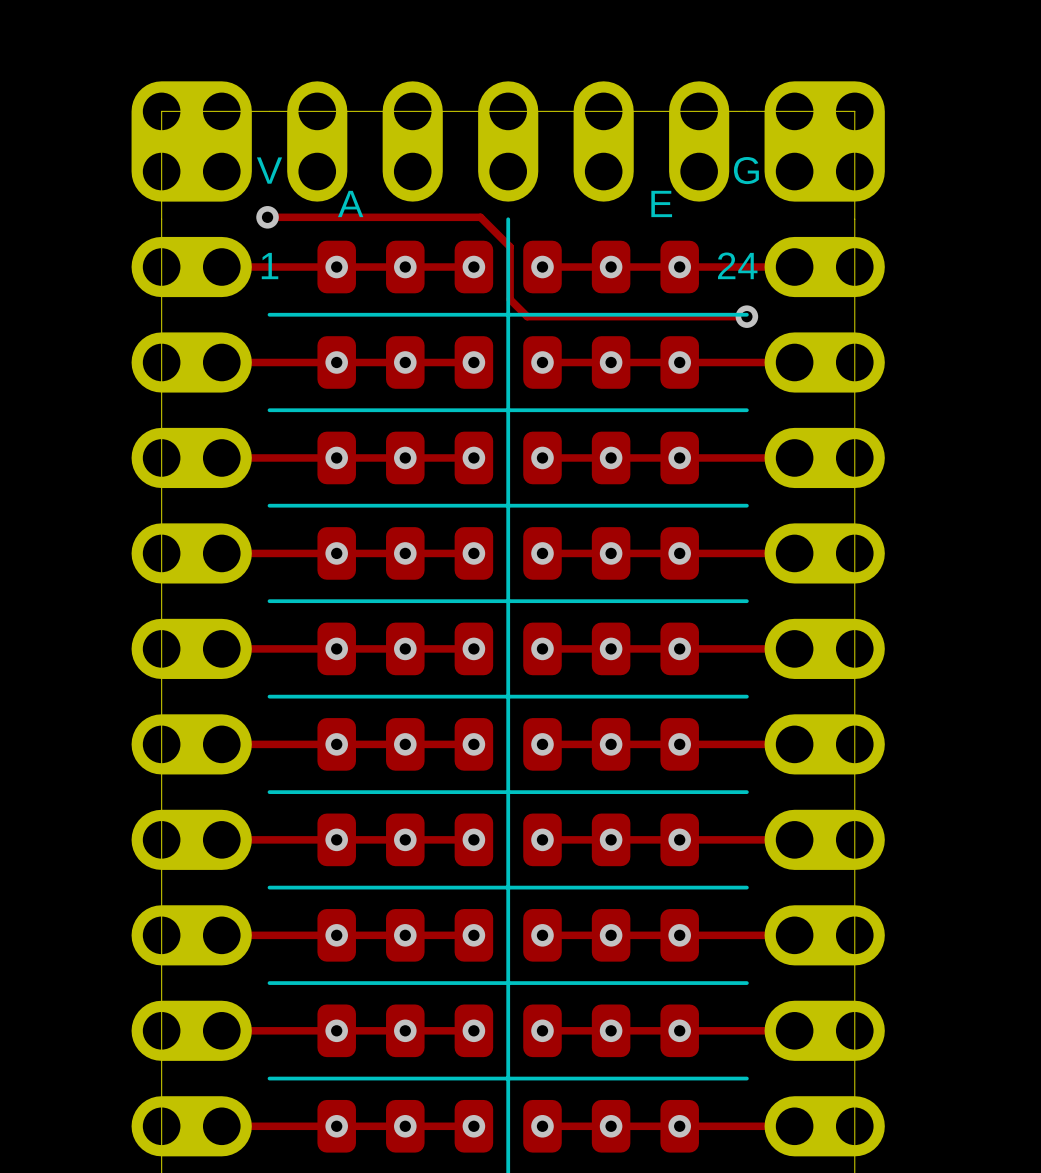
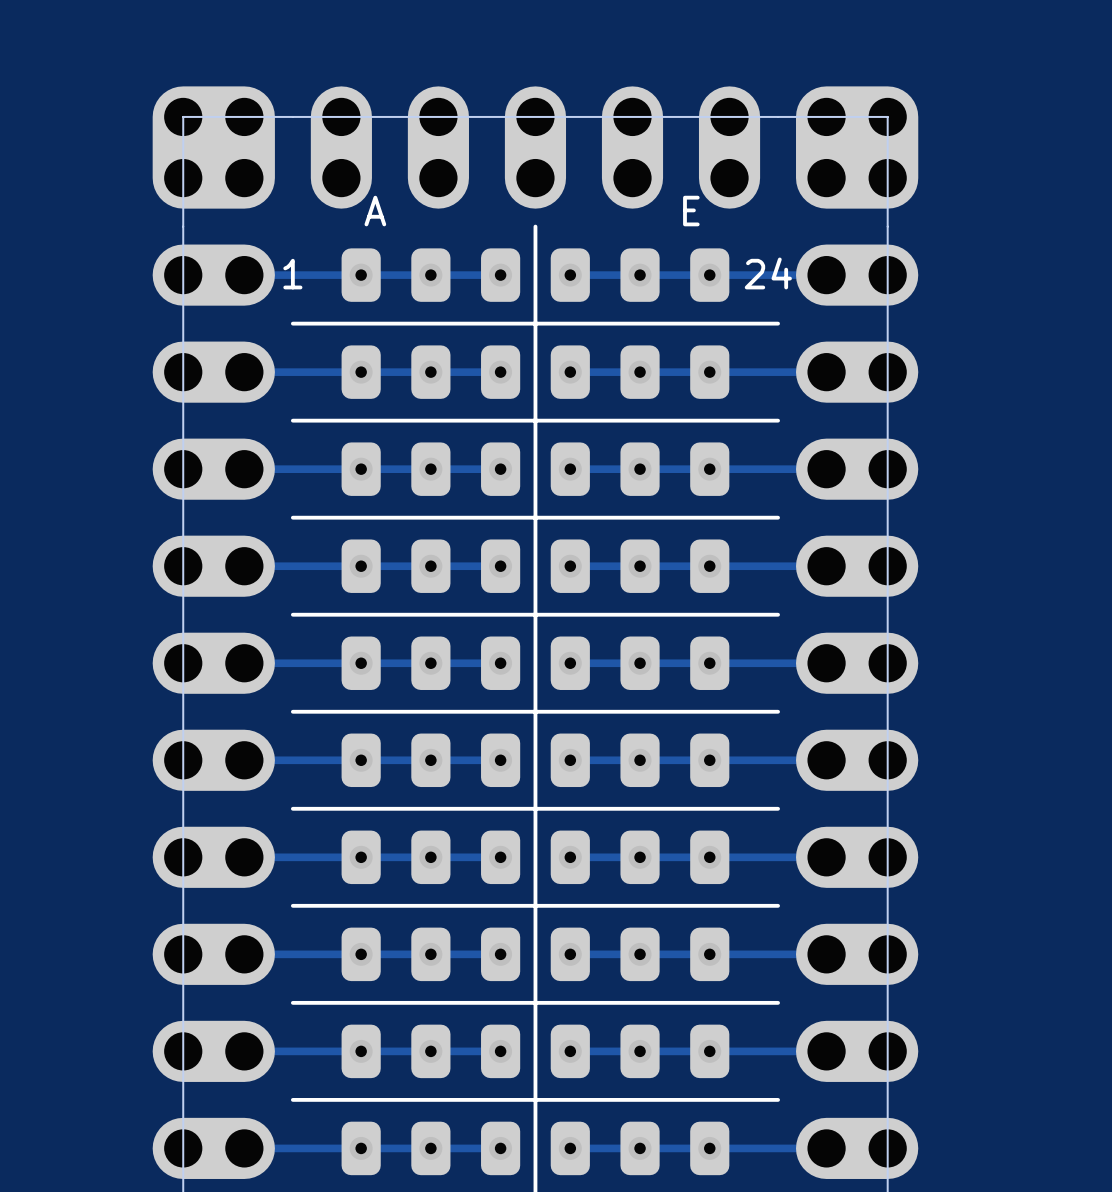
text: V (269, 170) -> none
text: G (746, 170) -> none
track: (267, 217) (480, 217) (510, 246) (510, 299) (527, 316) (746, 316) -> none
via: (267, 217) -> none
via: (746, 316) -> none

